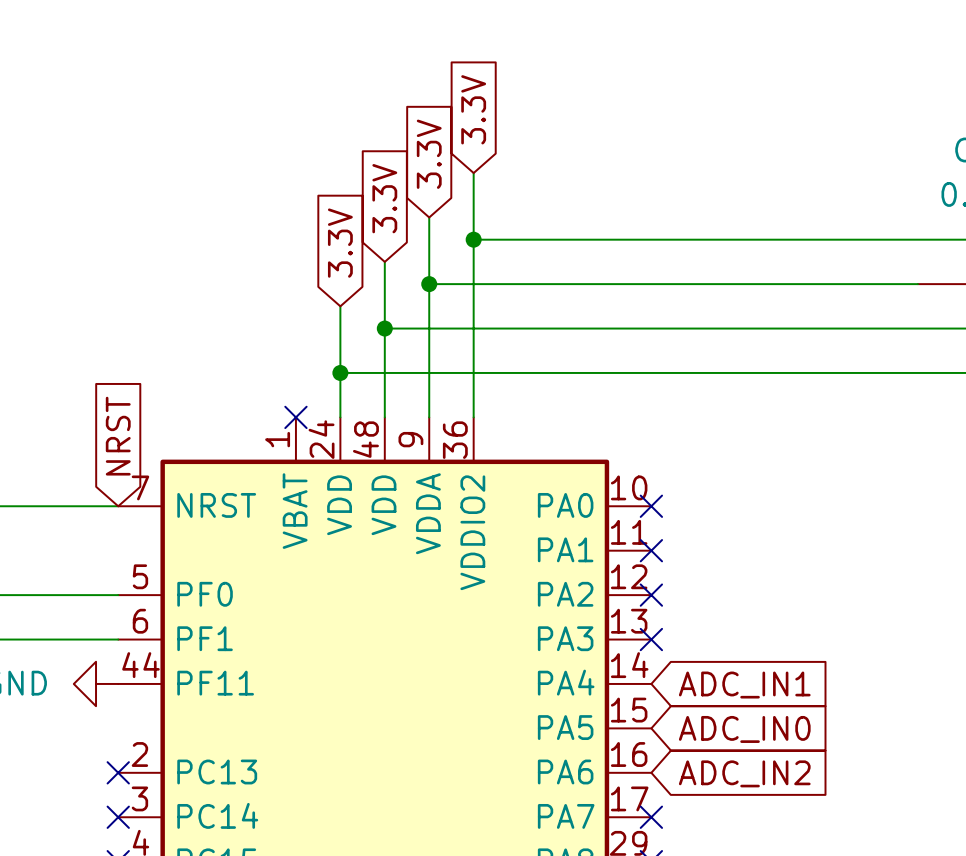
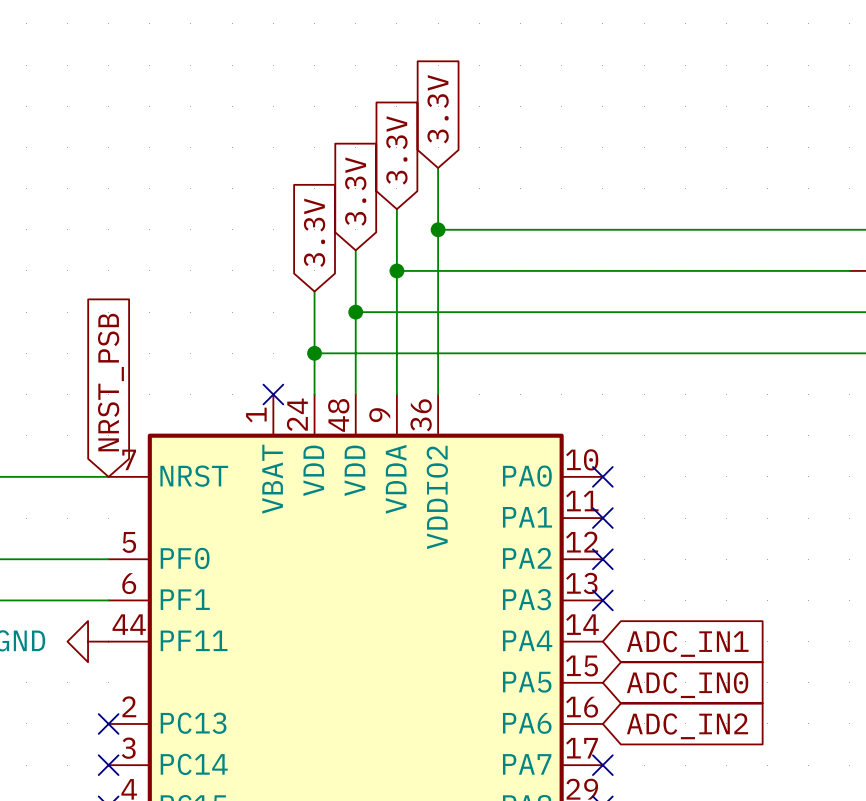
global label: NRST (118, 436) -> NRST_PSB (110, 382)

